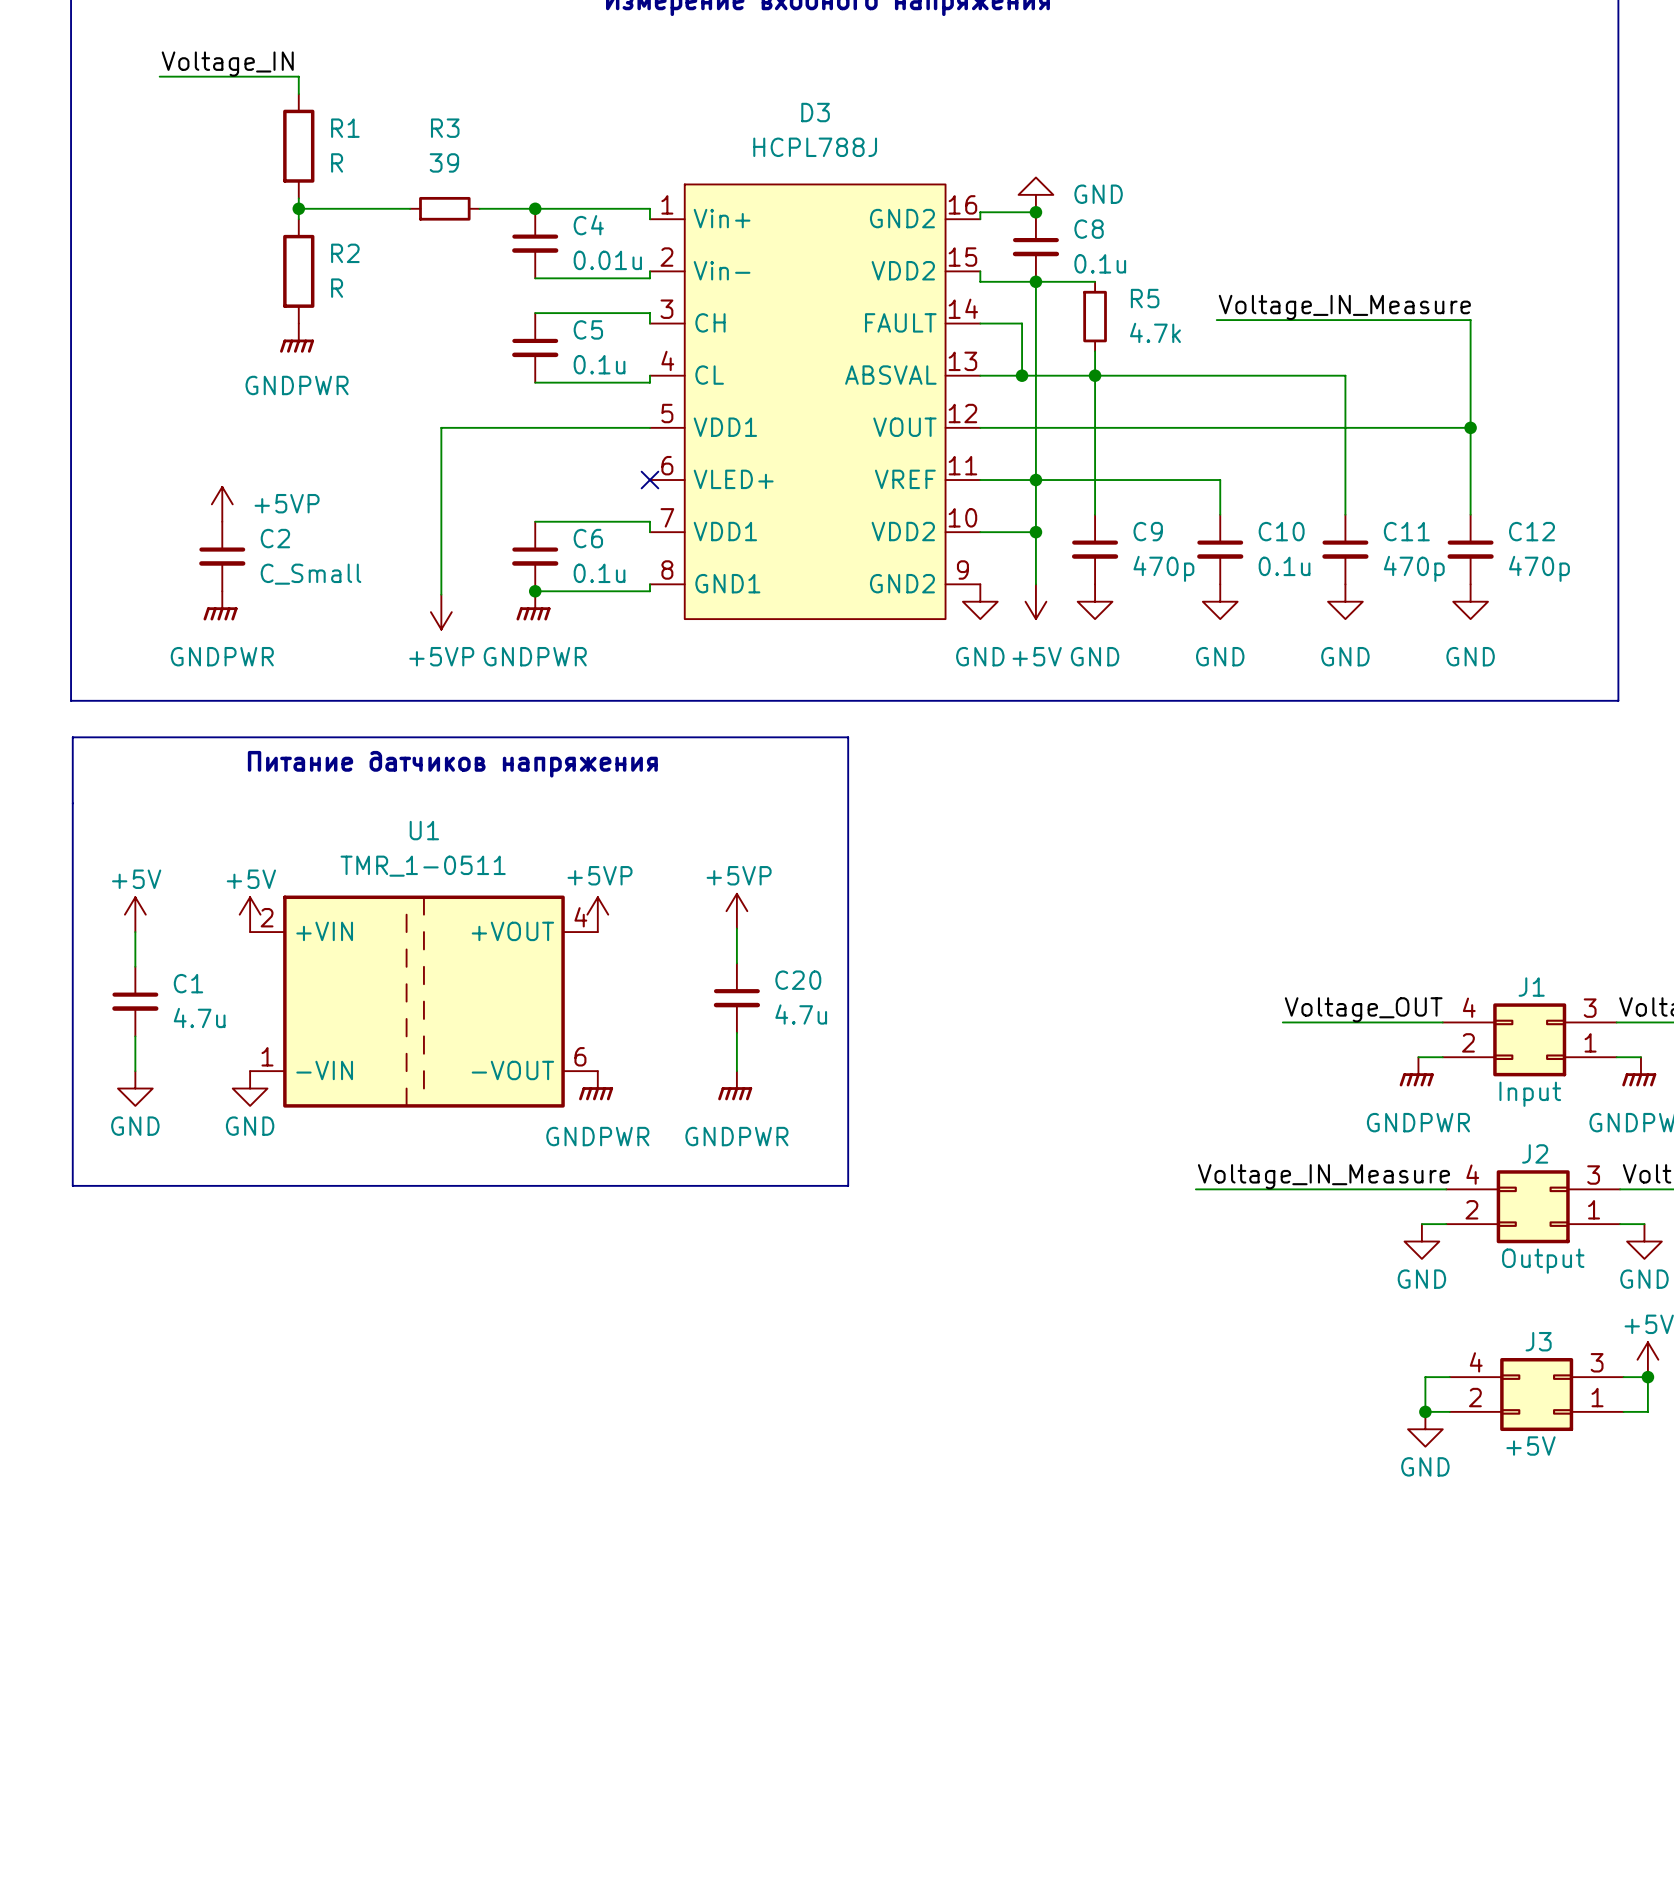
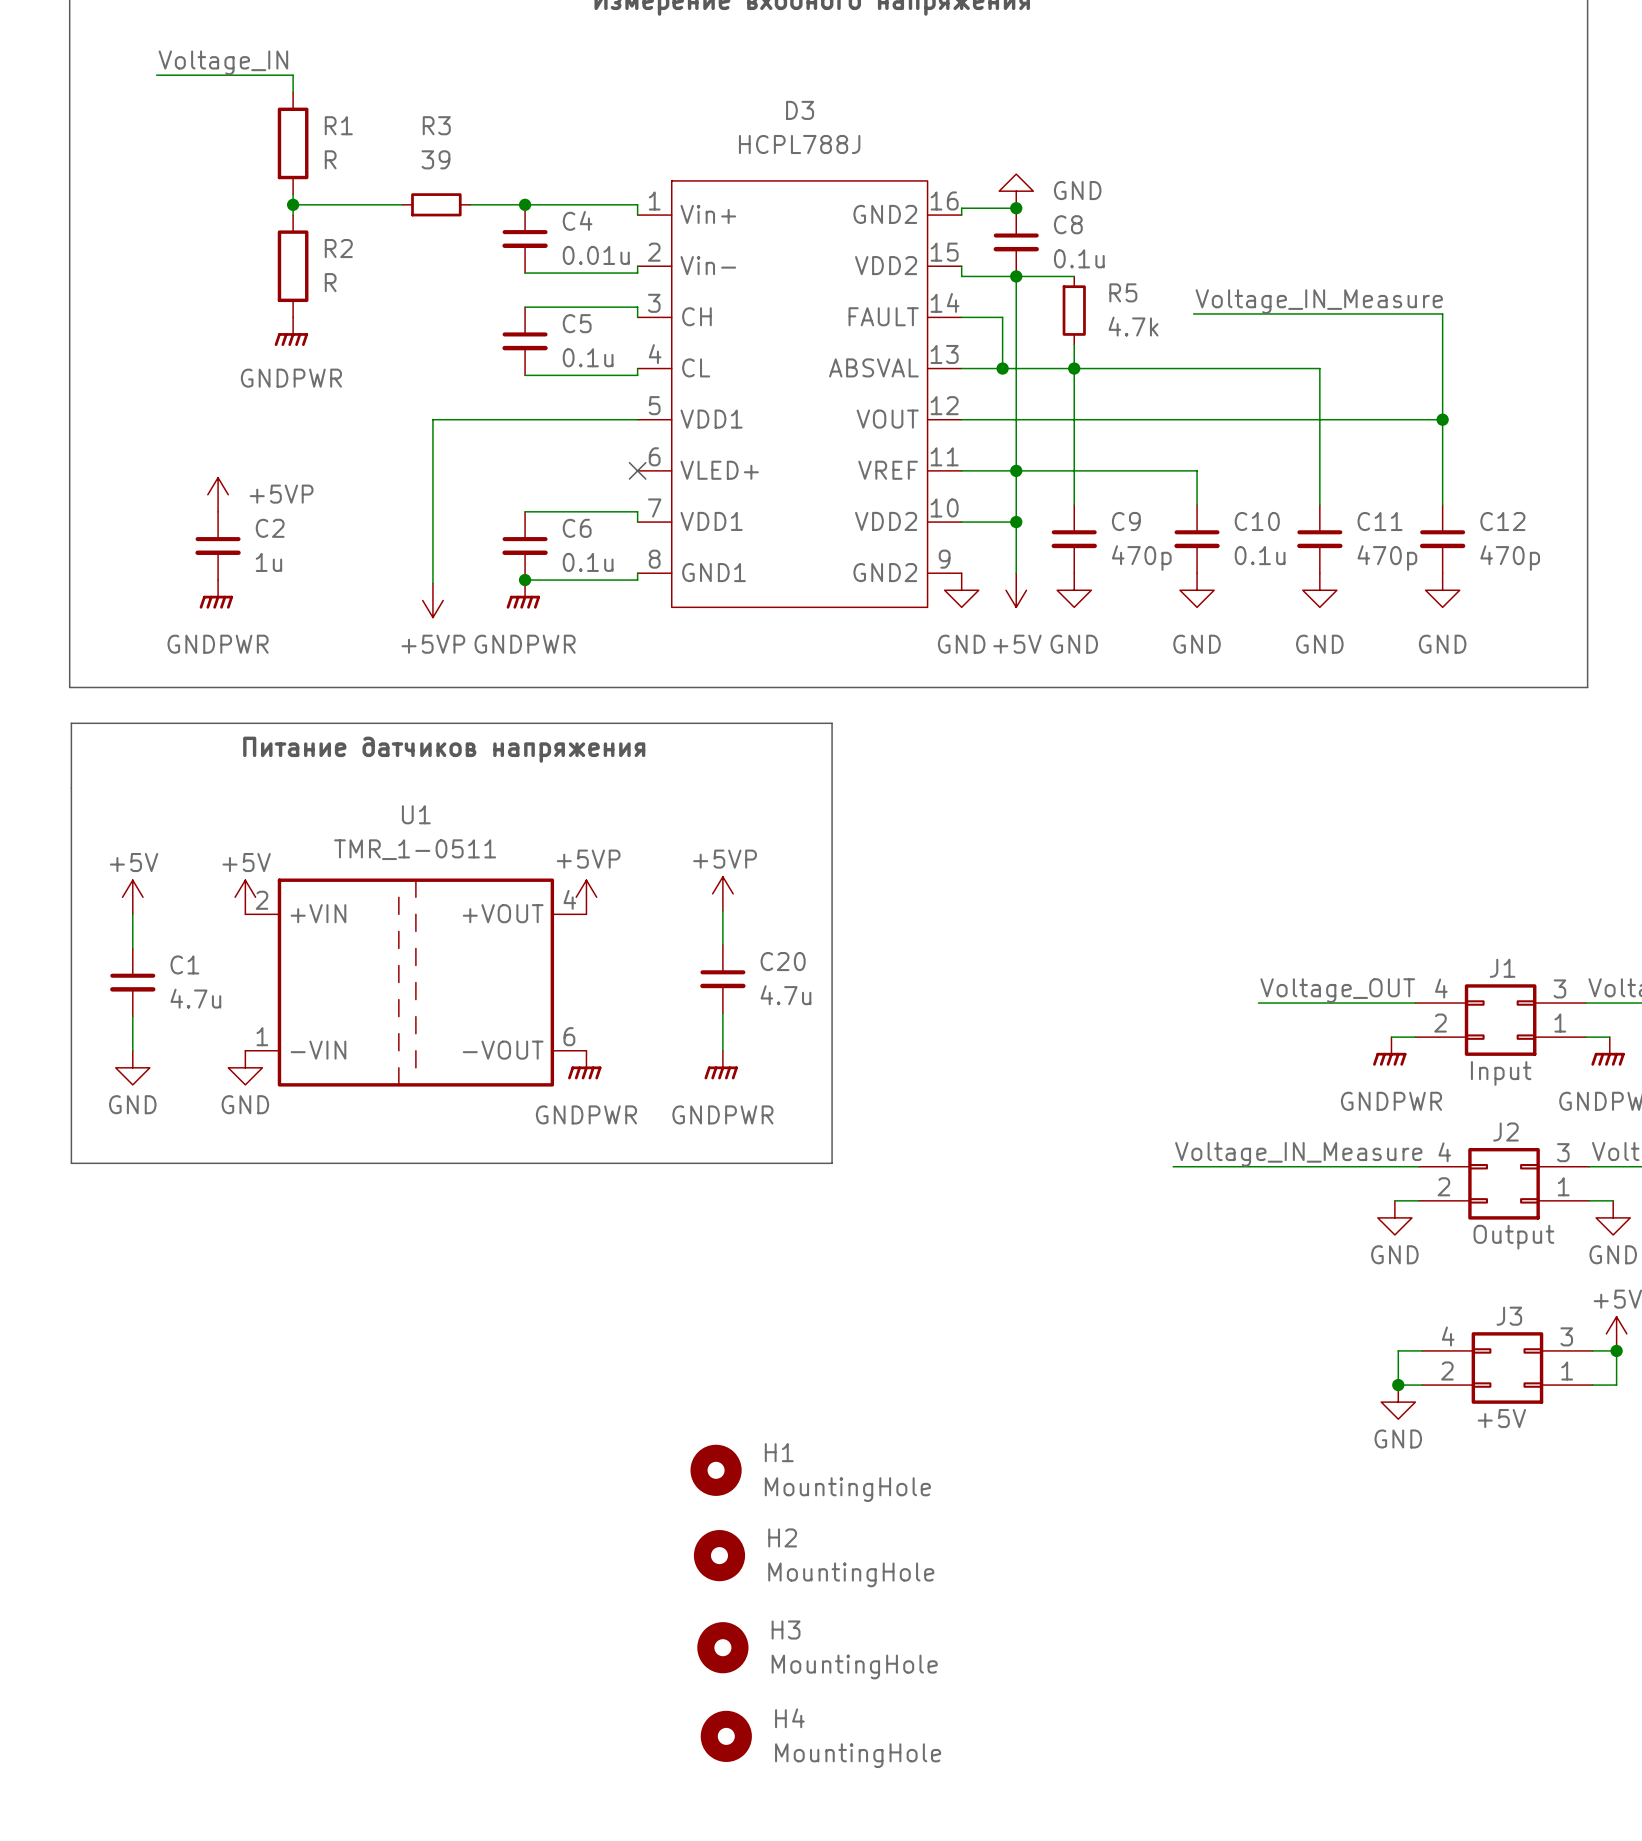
C2 value: C_Small (311, 574) -> 1u (268, 562)
H1: none -> MountingHole (716, 1470)
H2: none -> MountingHole (719, 1555)
H3: none -> MountingHole (722, 1647)
H4: none -> MountingHole (726, 1736)

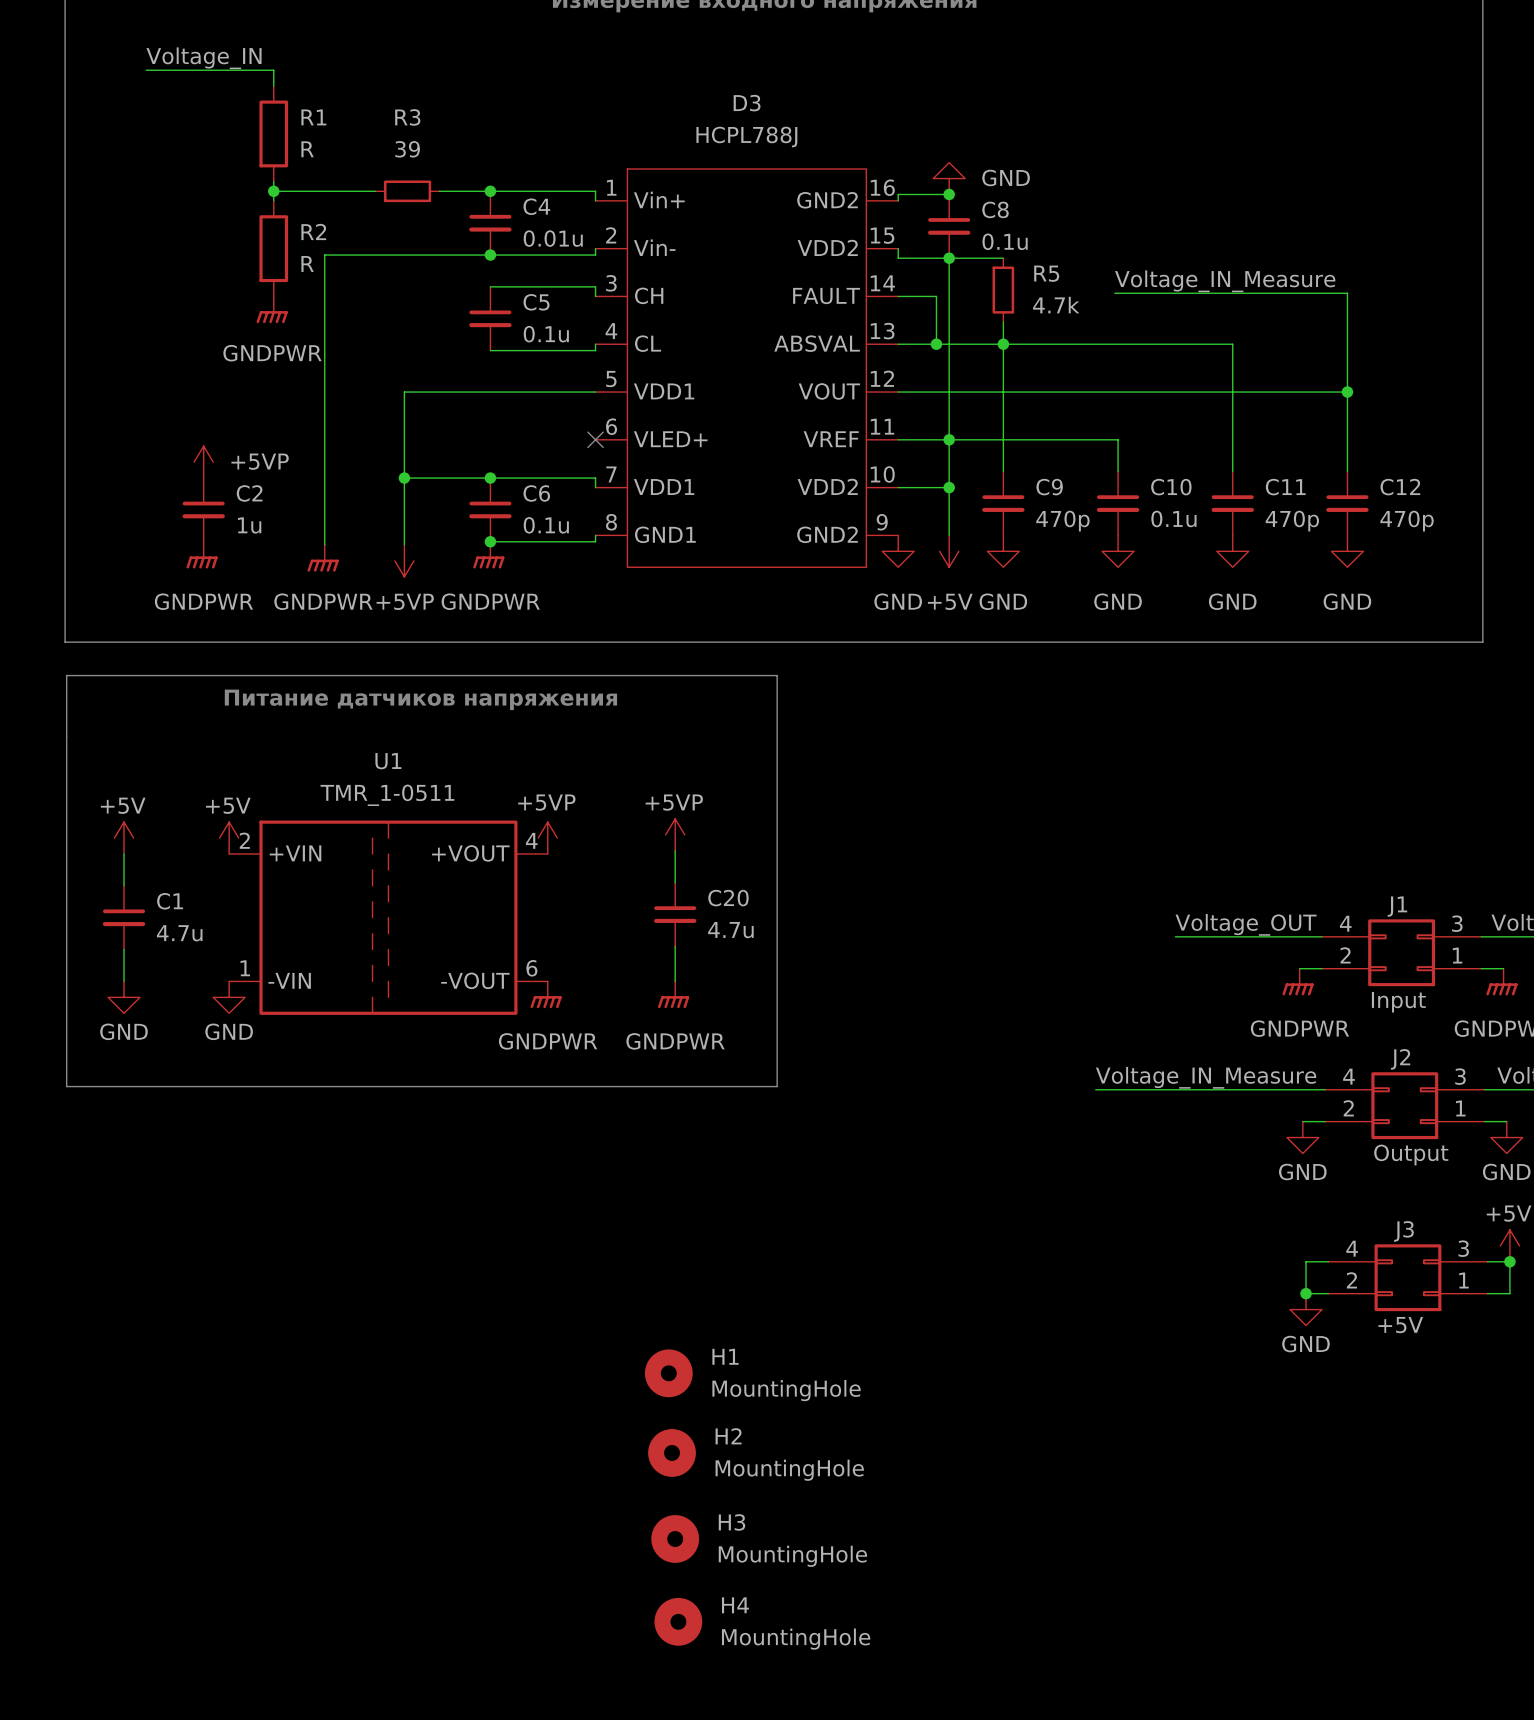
wire: none -> (490, 255) (324, 255) (324, 544)
junction: none -> (490, 255)
wire: none -> (404, 478) (490, 478)
junction: none -> (404, 478)
junction: none -> (490, 478)
power symbol: none -> GNDPWR (323, 558)

